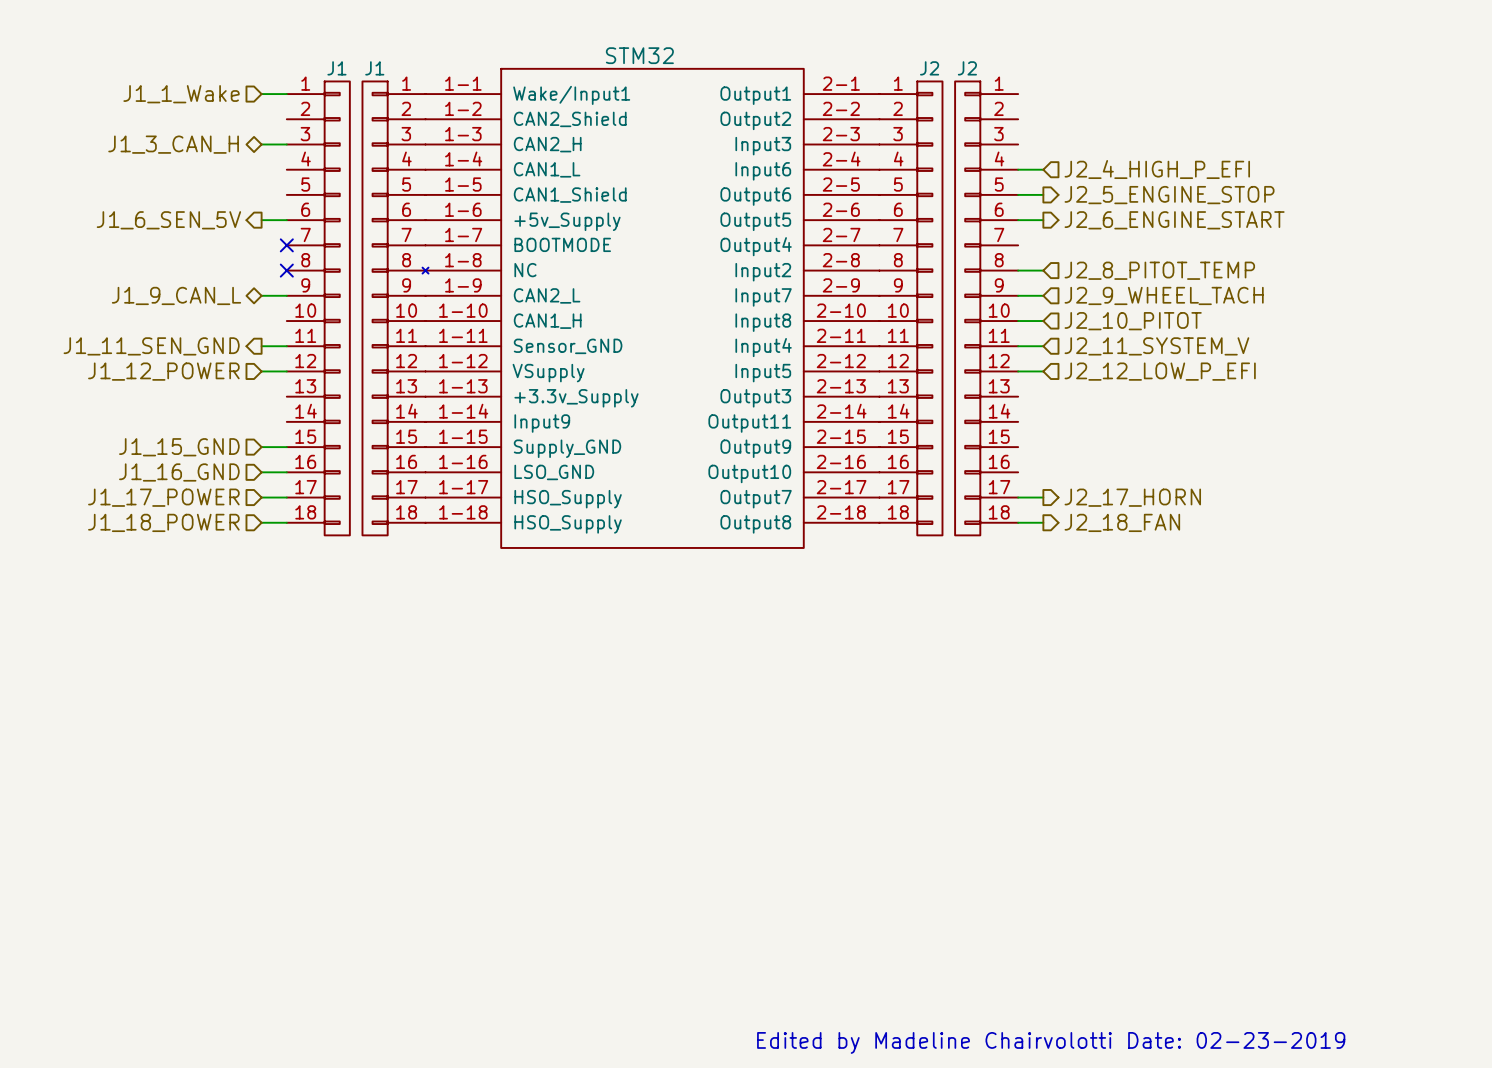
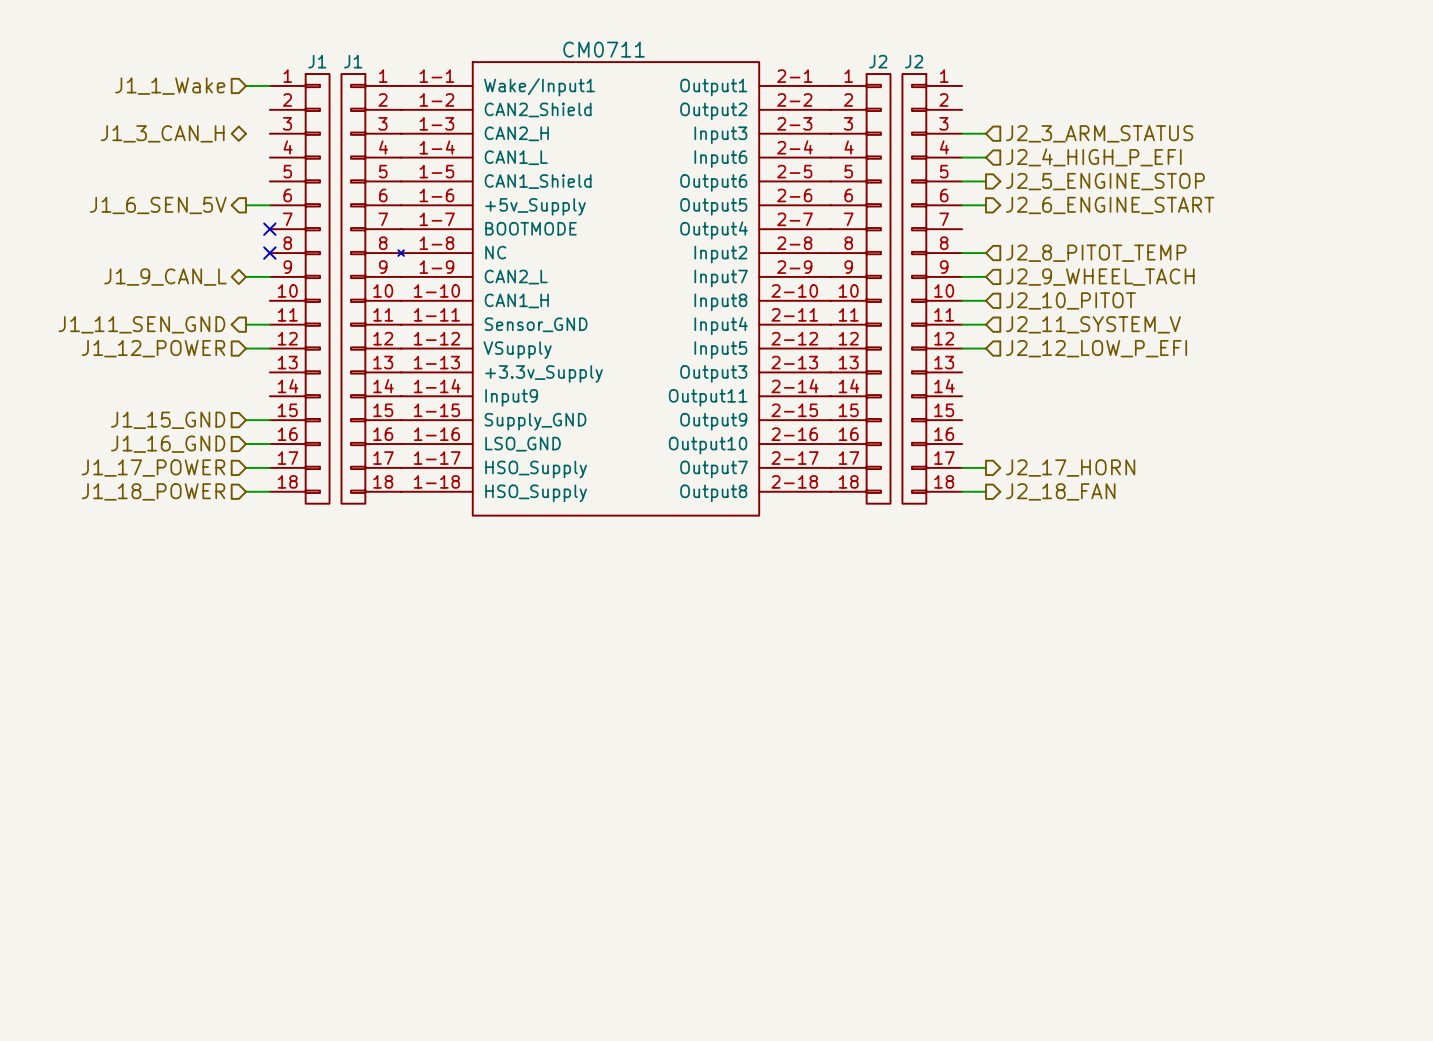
part value: STM32 (639, 55) -> CM0711 (604, 49)
wire: (261, 144) (286, 144) -> none
wire: none -> (962, 133) (985, 133)
hierarchical label: none -> J2_3_ARM_STATUS (1099, 133)
text: Edited by Madeline Chairvolotti Date: 02-23-2019 (1051, 1042) -> none

